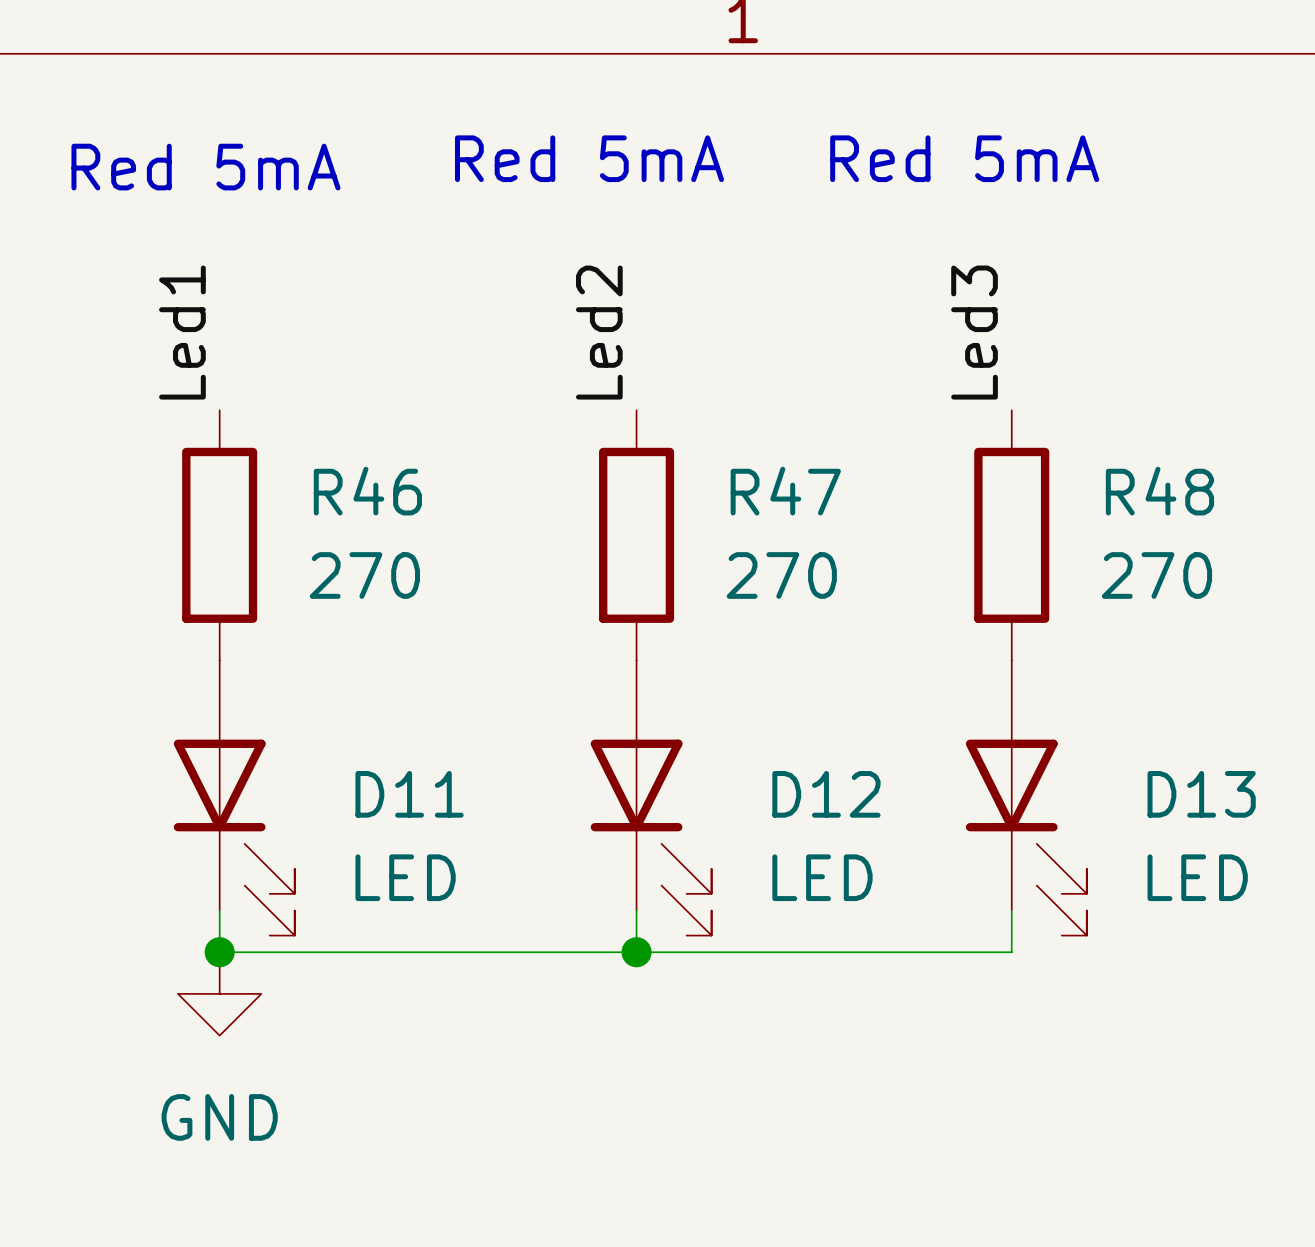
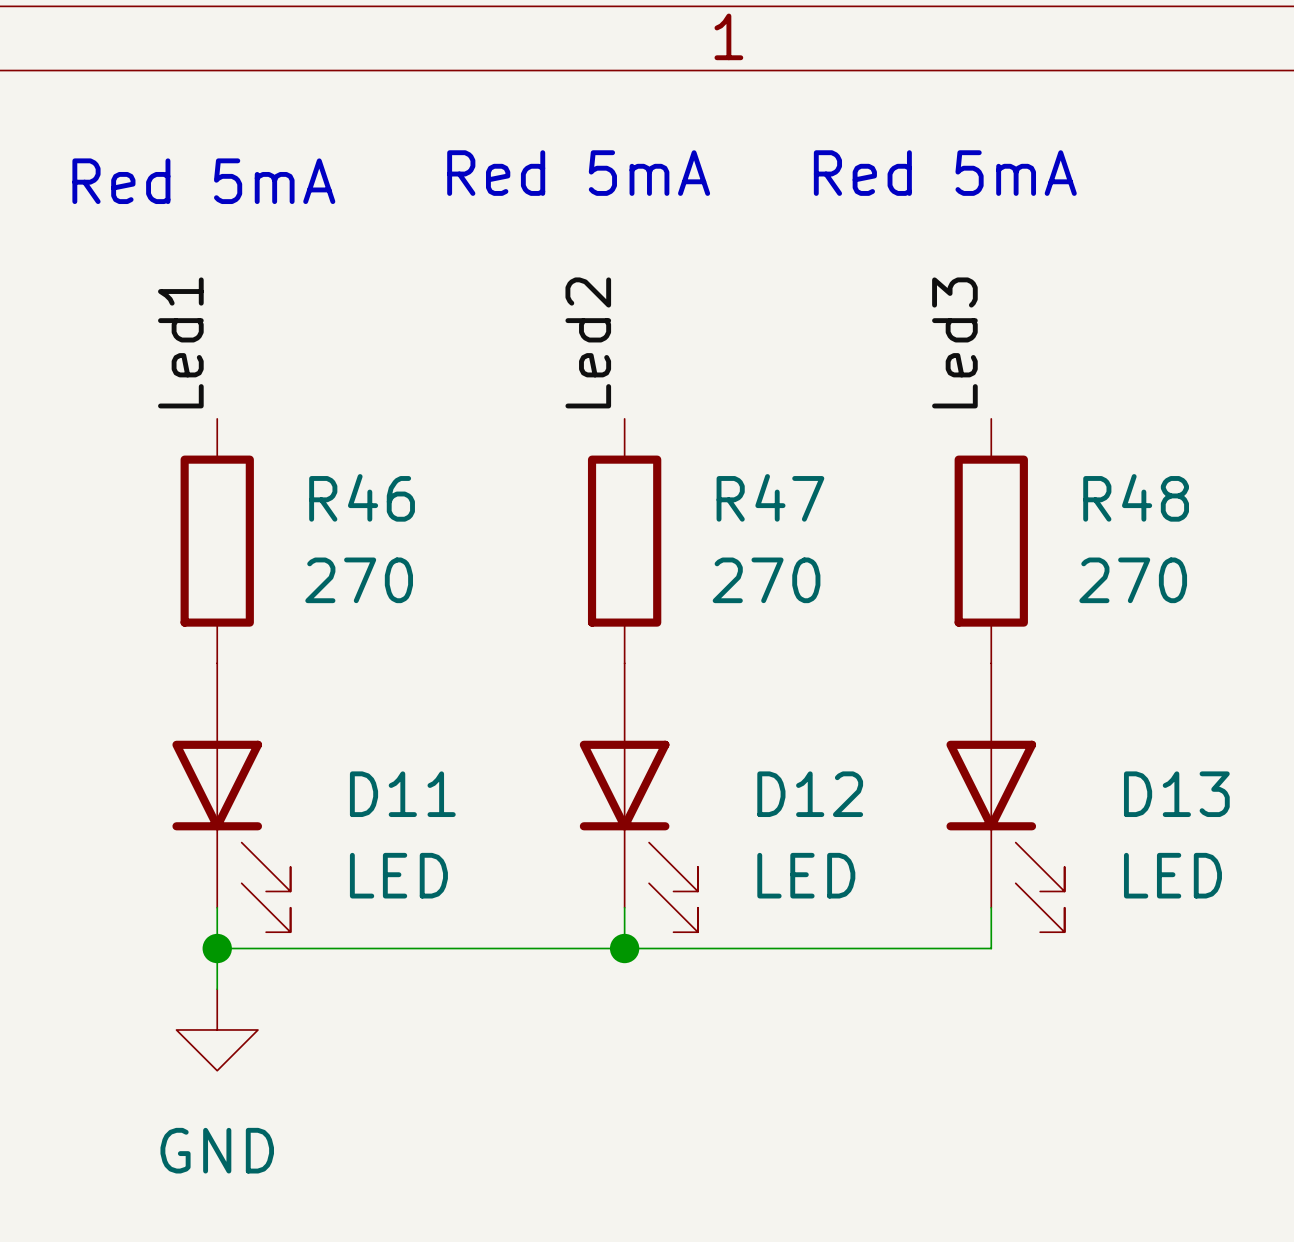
power symbol position: GND (219, 993) -> GND (217, 1029)

